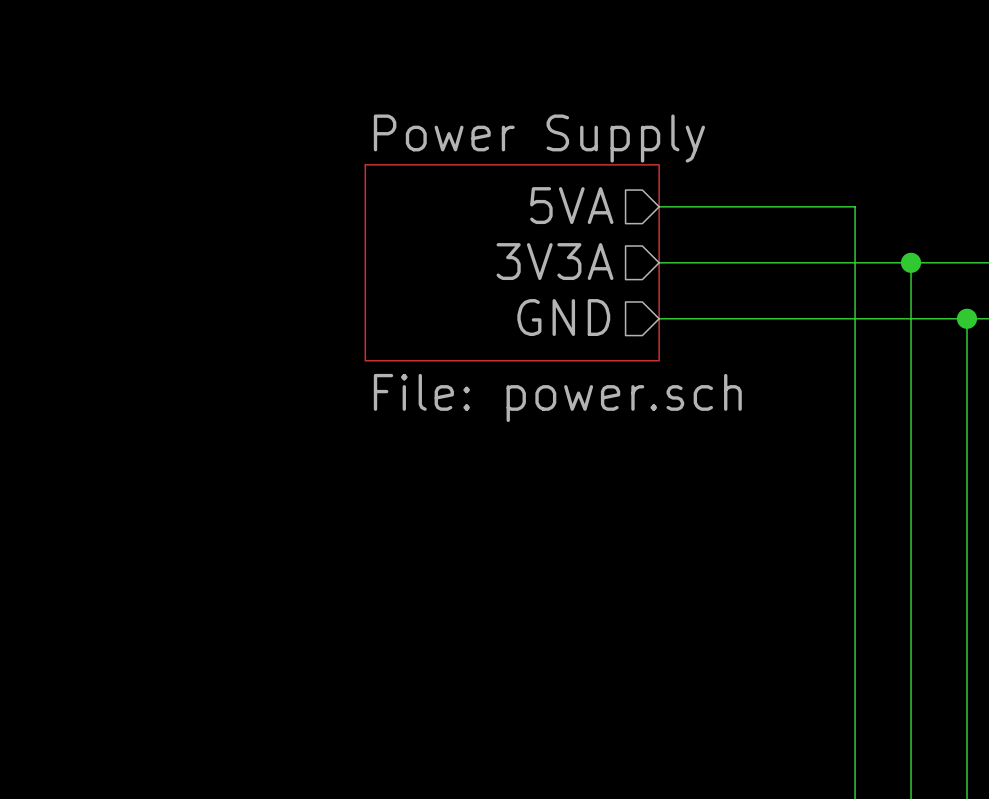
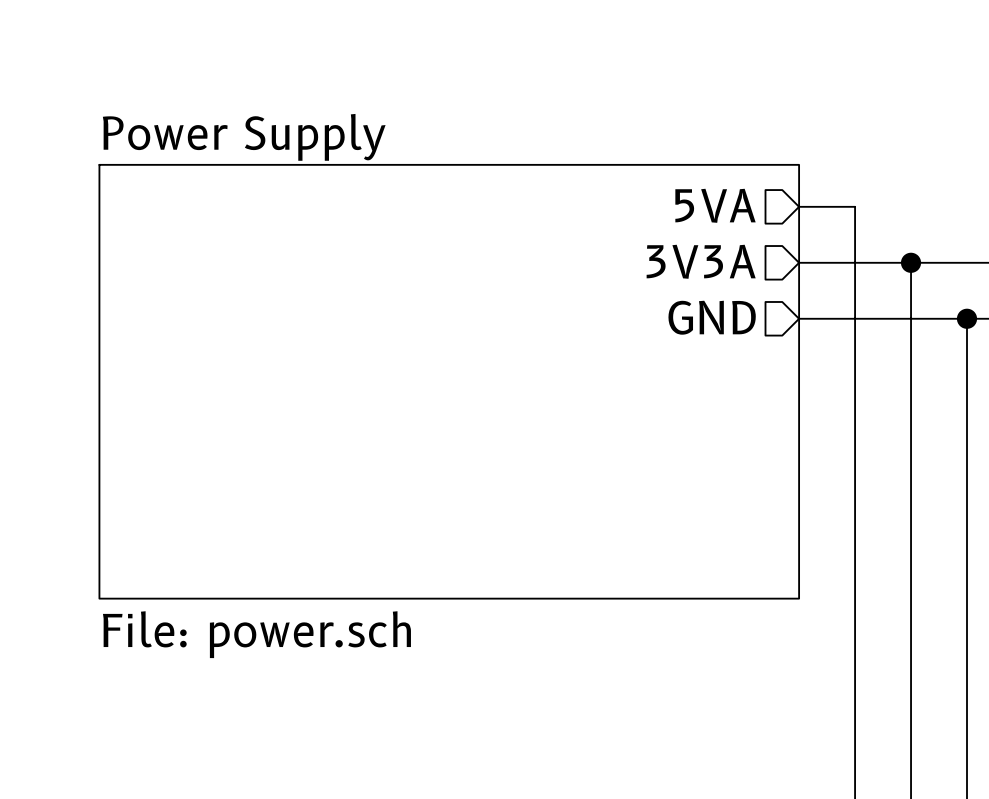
sheet pin position: 5VA (571, 205) -> 5VA (715, 205)
wire: (659, 206) (799, 206) -> none
sheet pin position: 3V3A (554, 261) -> 3V3A (701, 261)
sheet Power Supply: File: power.sch (512, 262) -> none
wire: (659, 262) (799, 262) -> none
sheet pin position: GND (563, 317) -> GND (712, 317)
wire: (659, 318) (799, 318) -> none
sheet Power Supply: none -> File: power.sch (449, 381)

